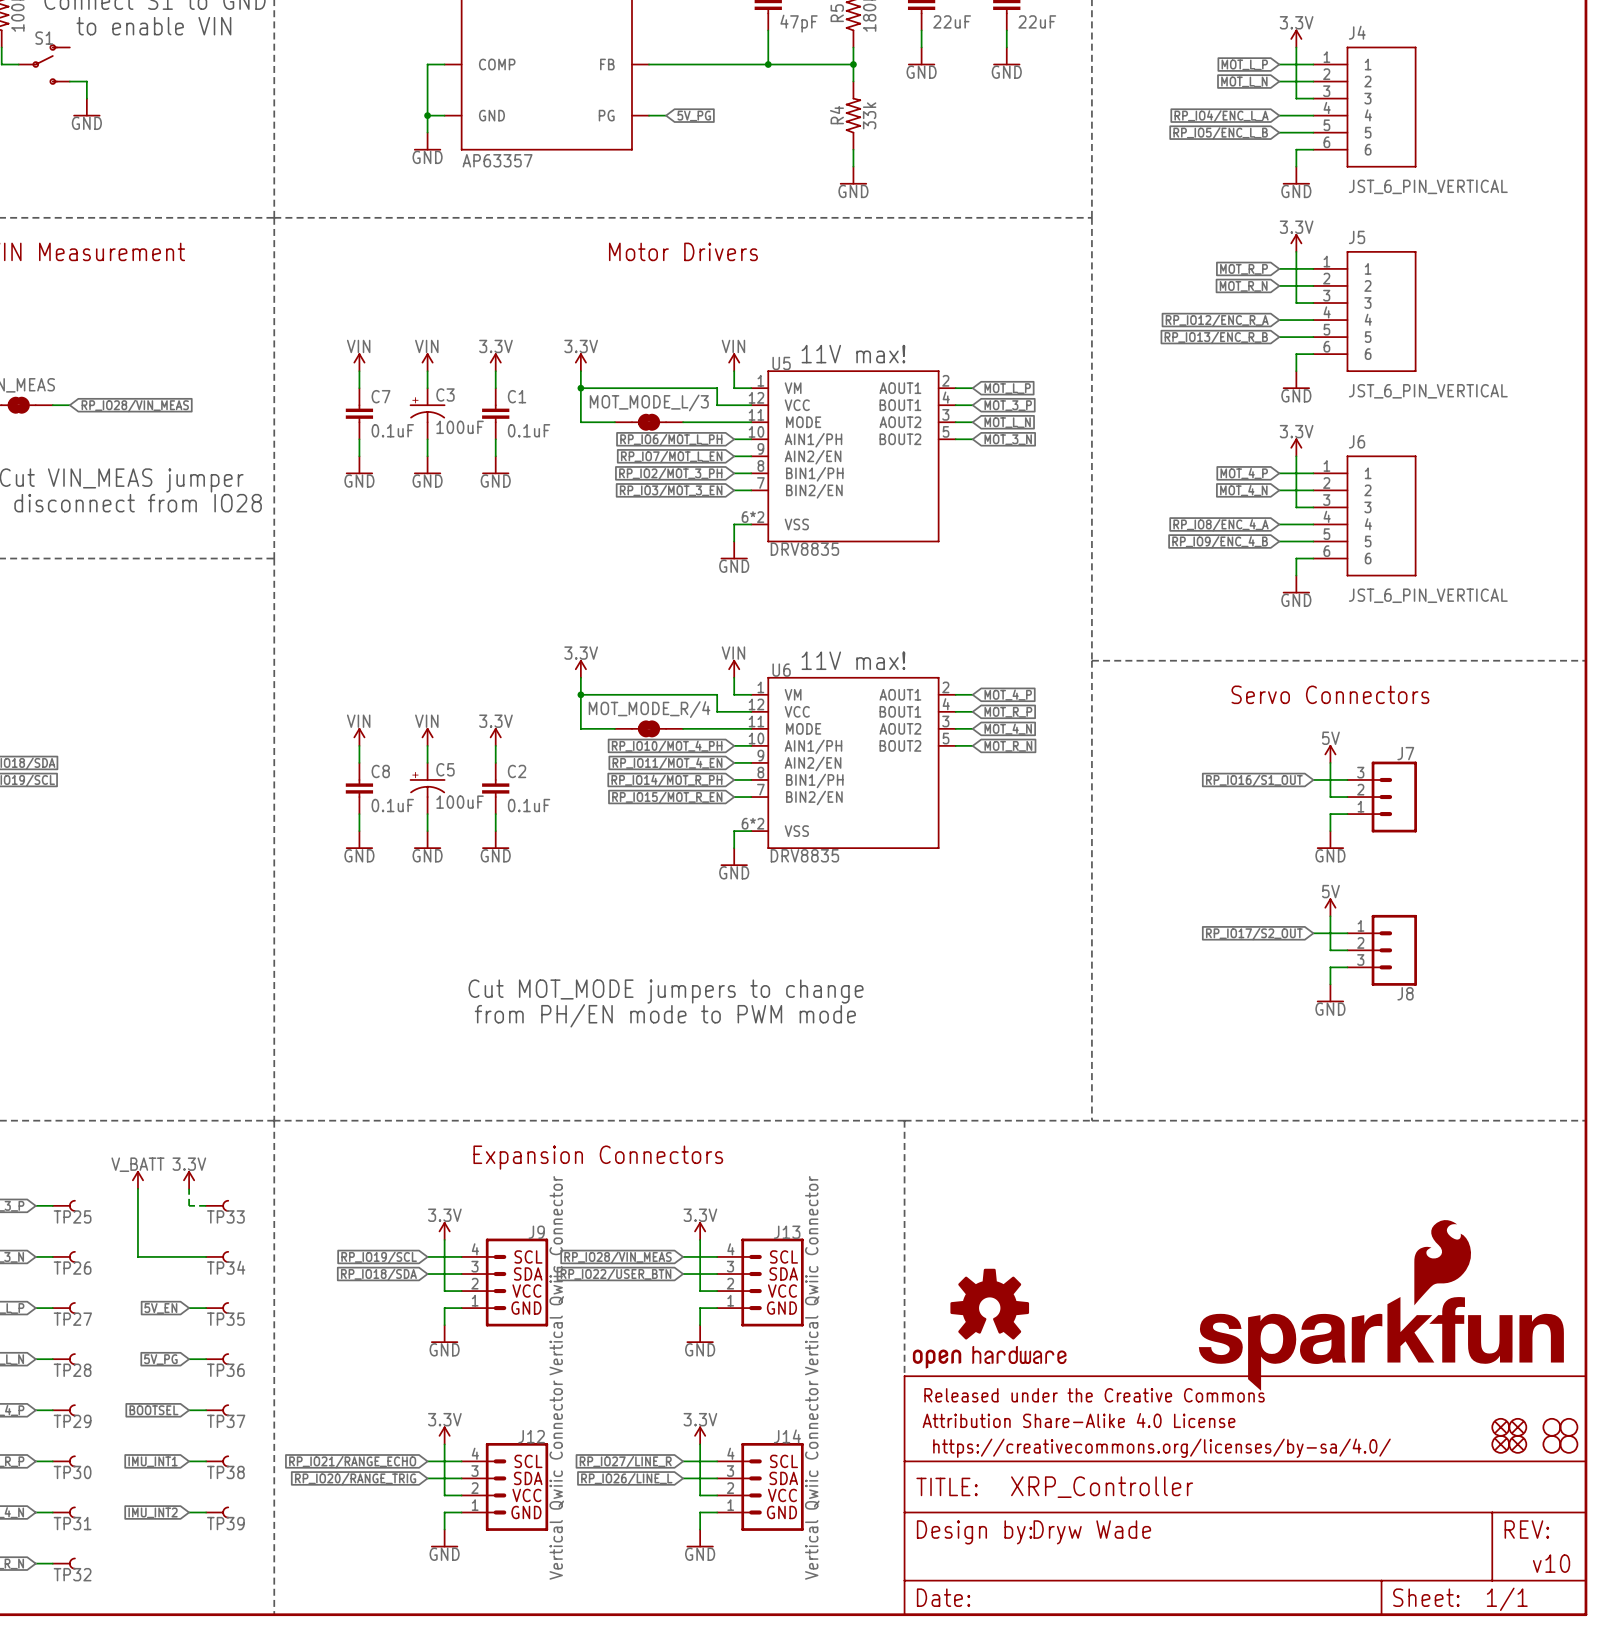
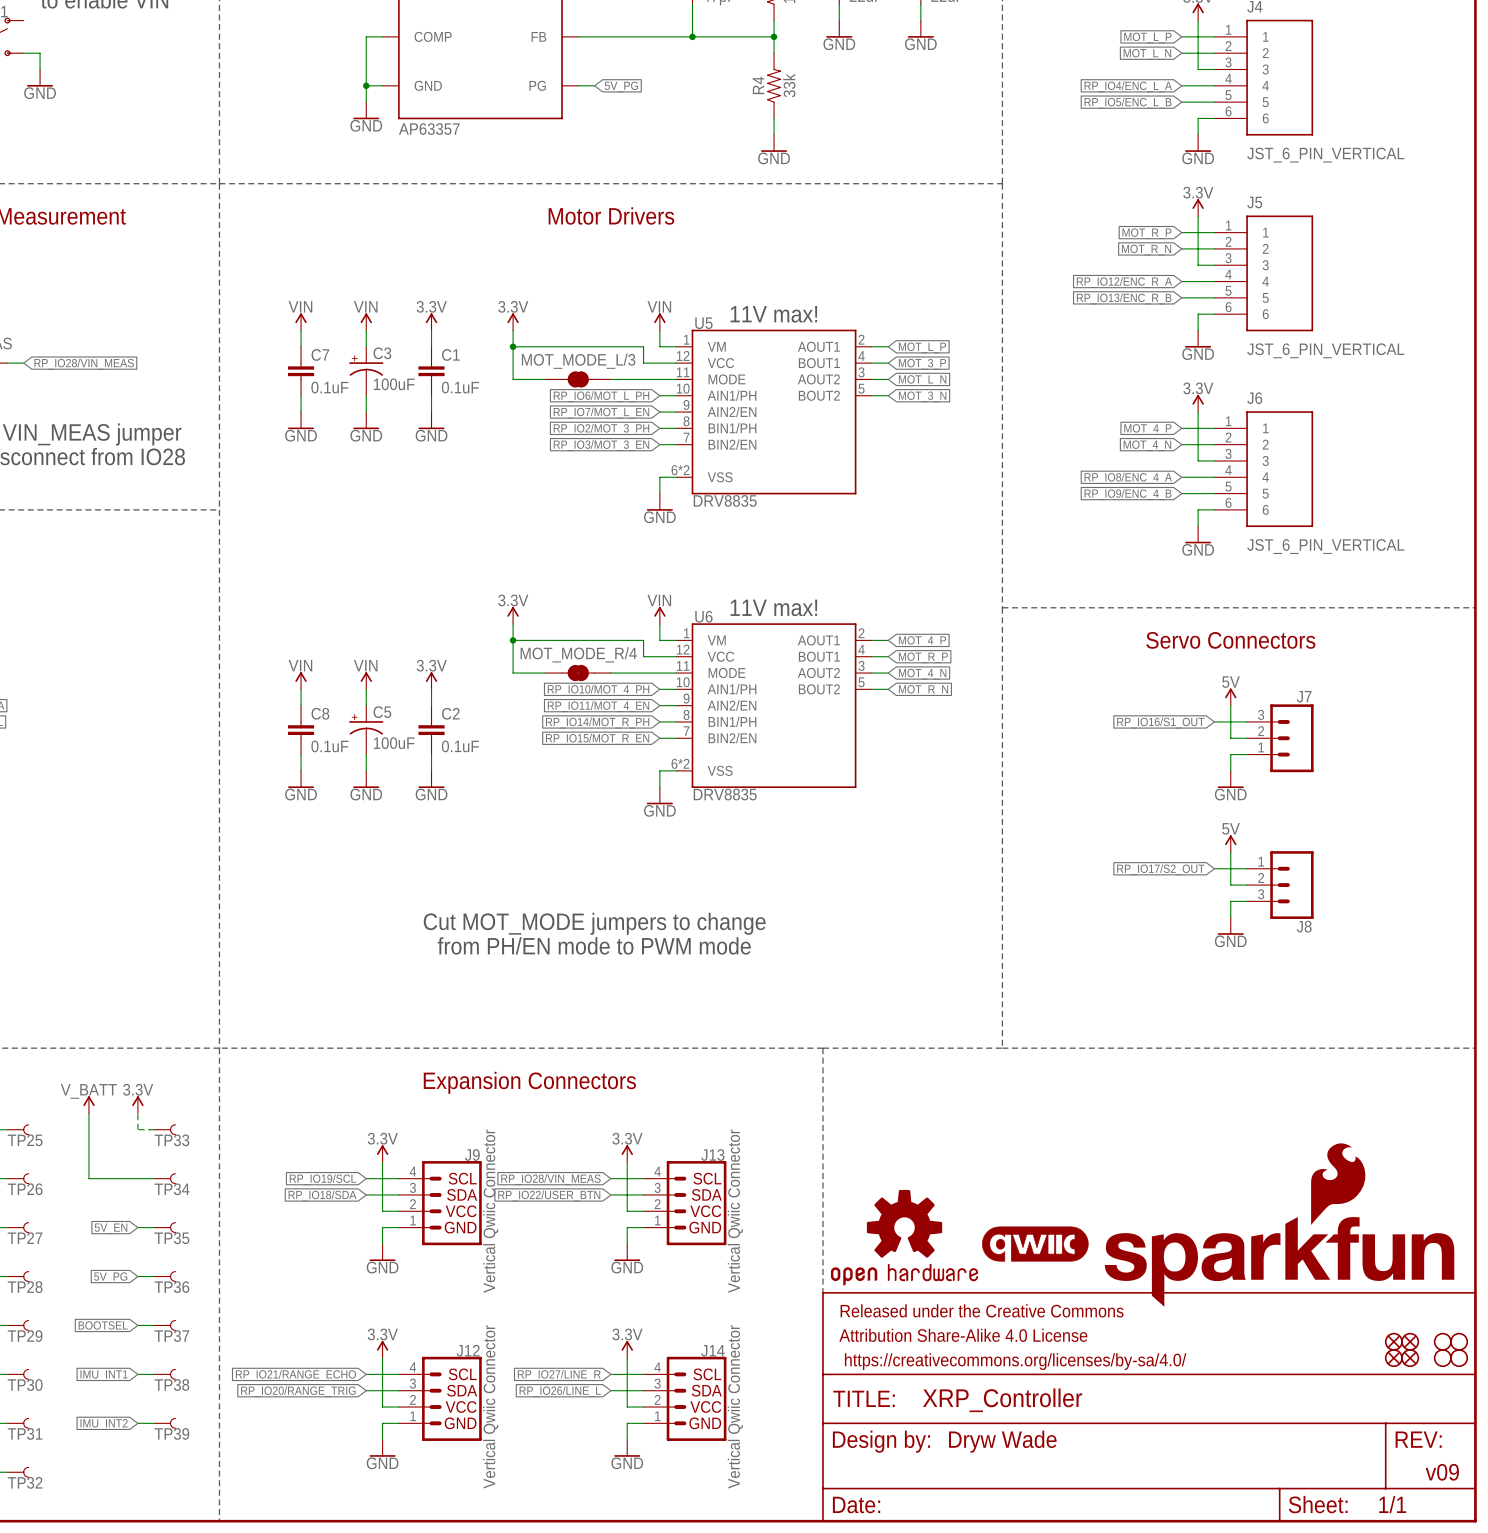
part: none -> (1035, 1244)
text: v10 (1551, 1563) -> v09 (1442, 1472)

